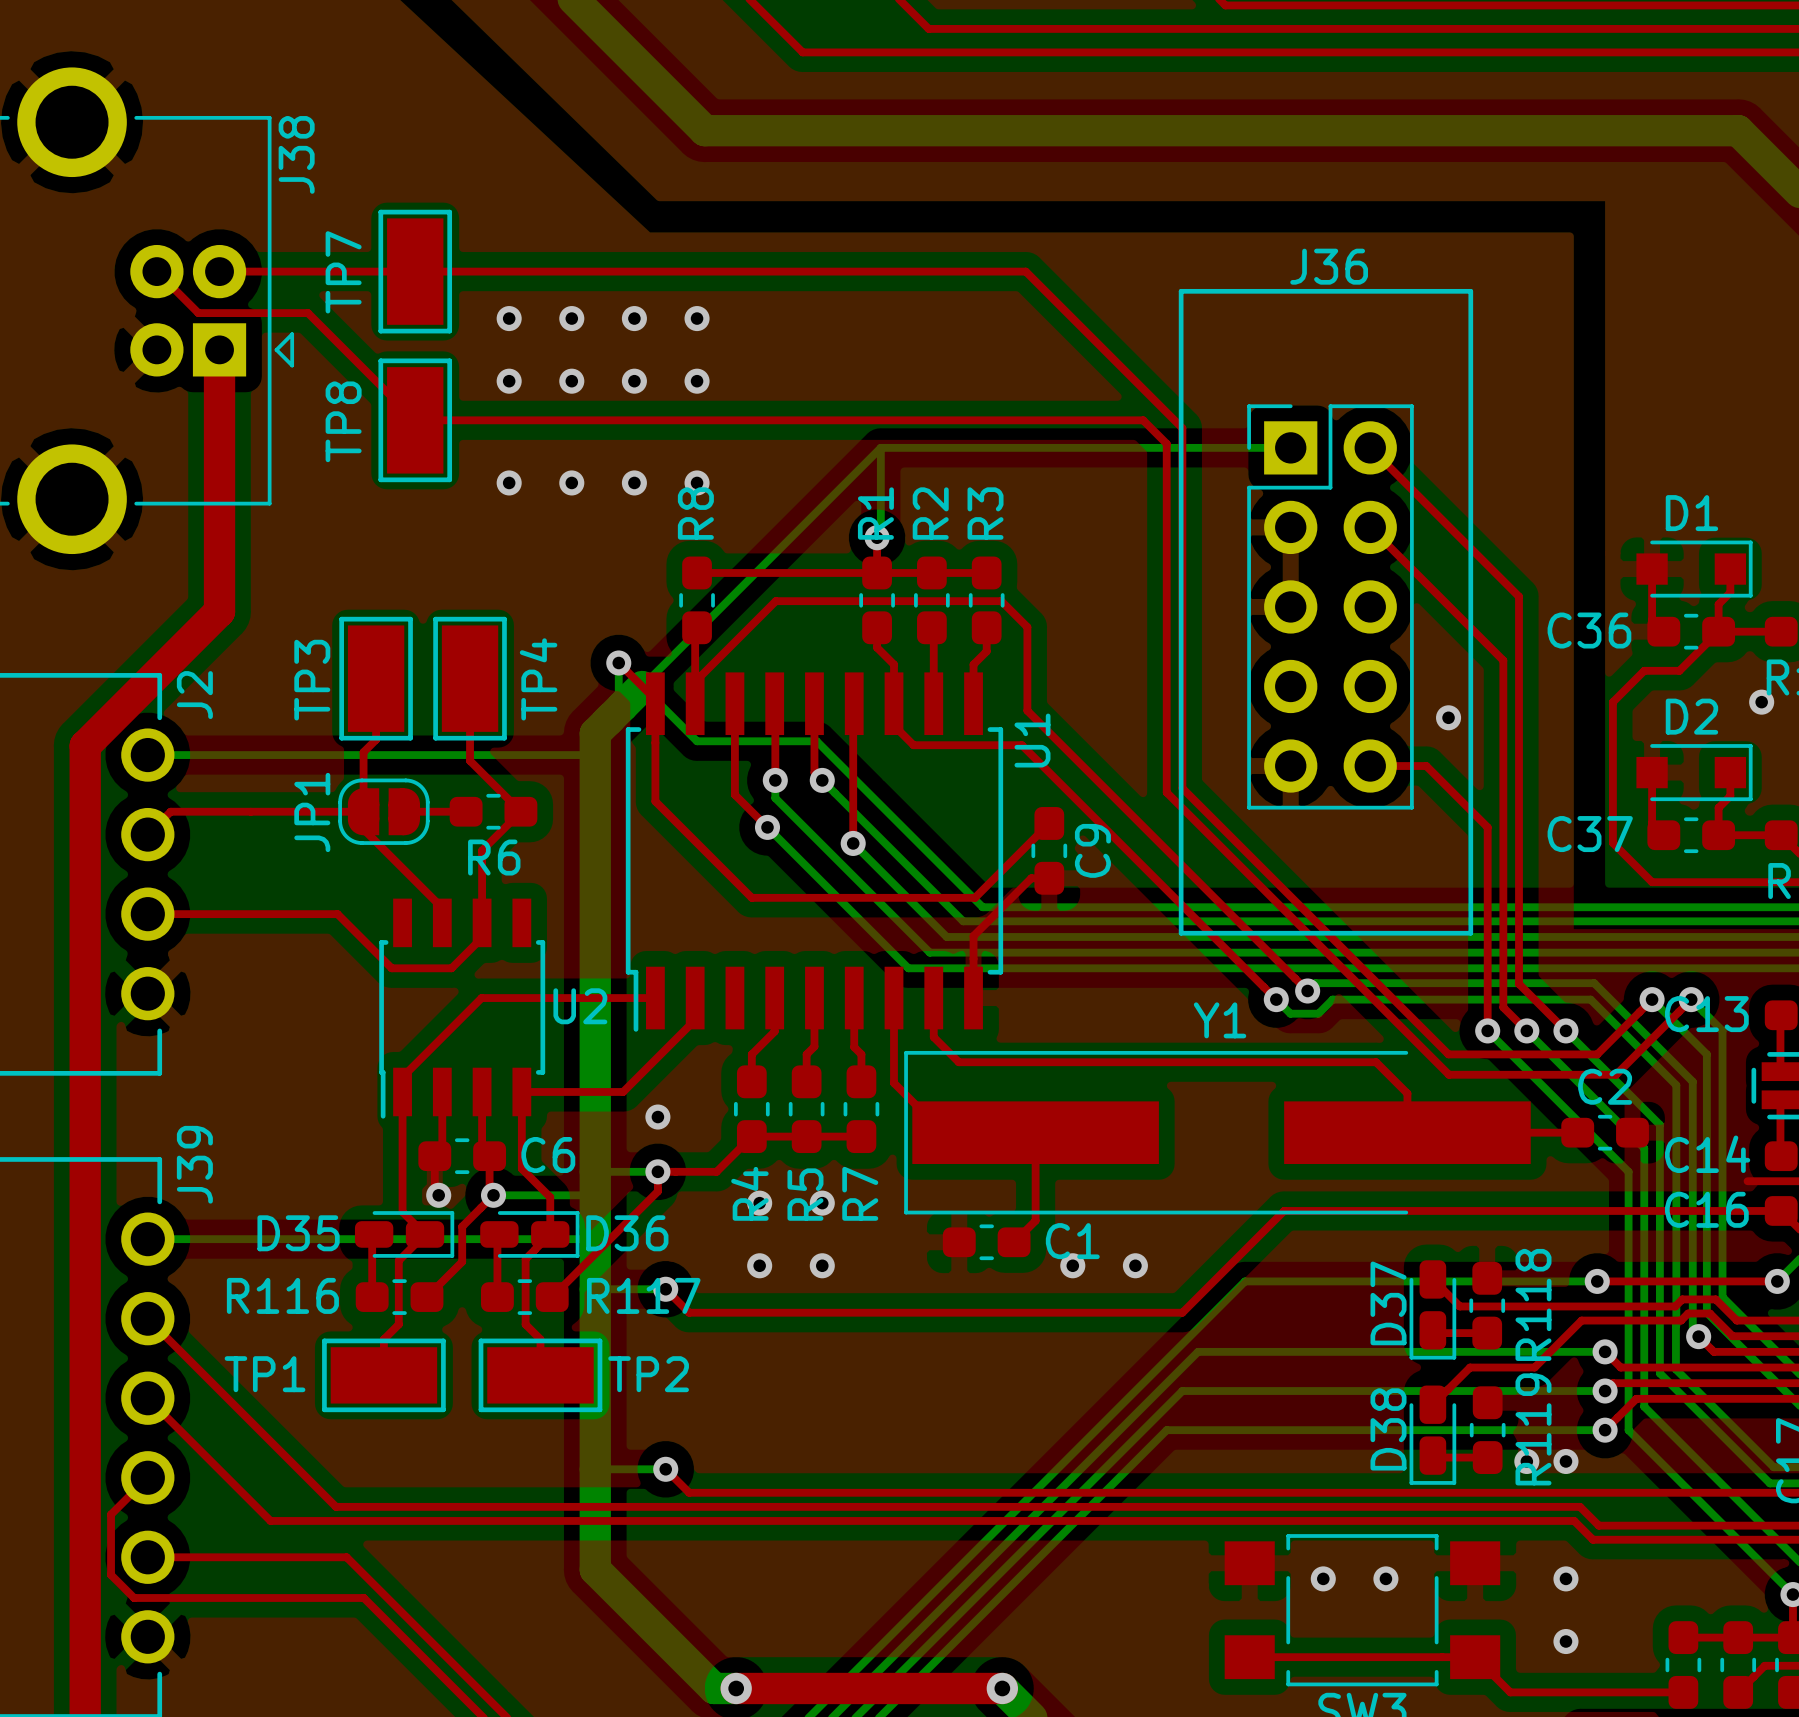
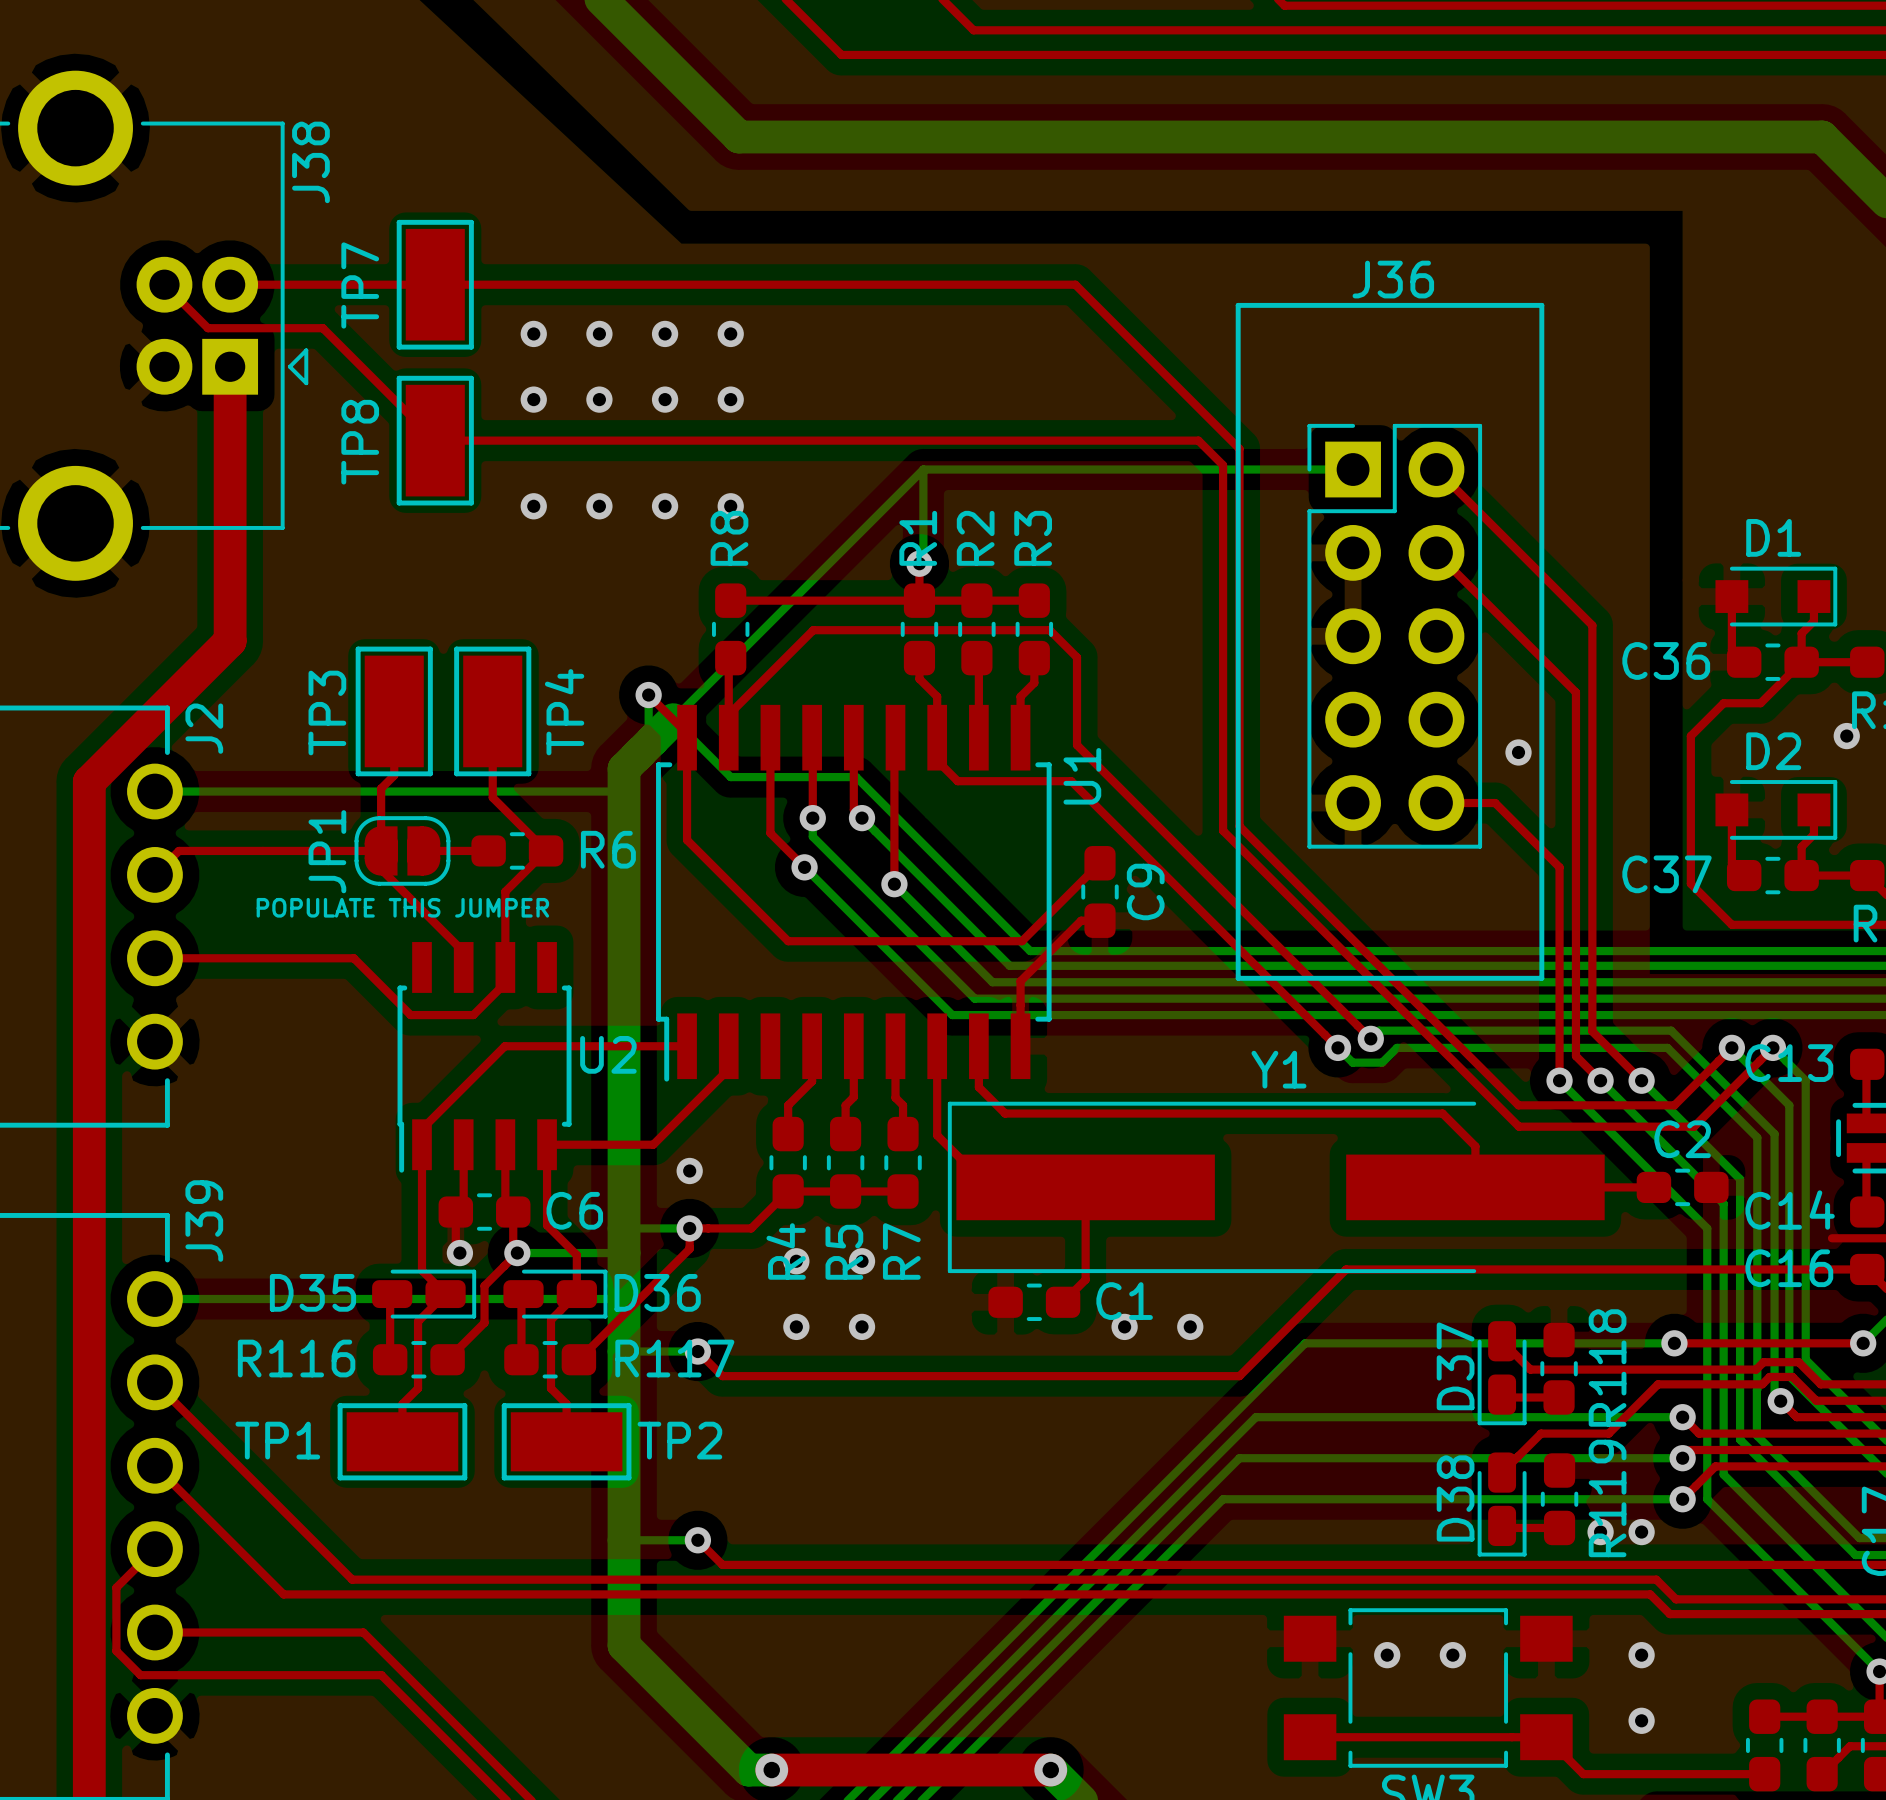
R6 name position: R6 (494, 857) -> R6 (608, 849)
text: none -> POPULATE THIS JUMPER (402, 907)

